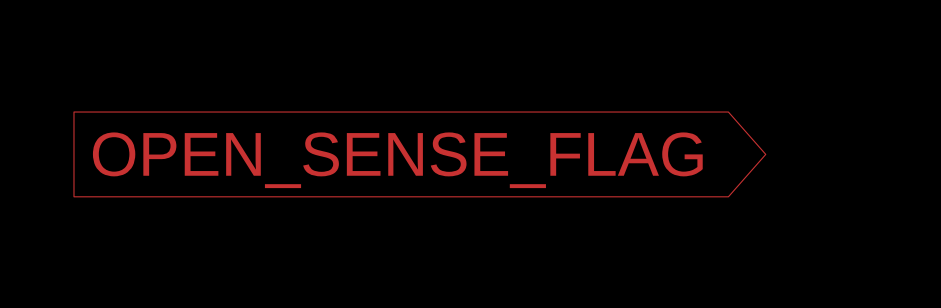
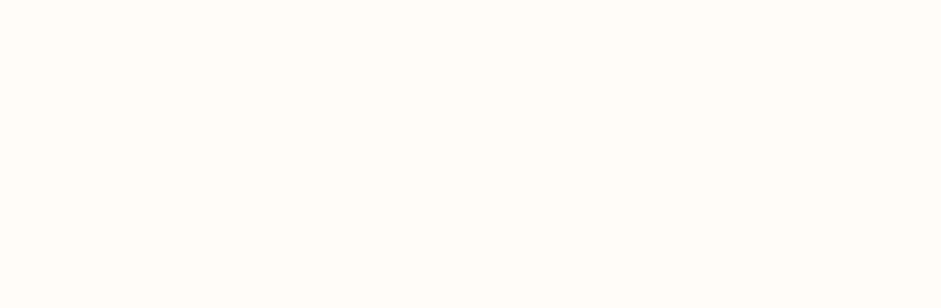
global label: OPEN_SENSE_FLAG (397, 160) -> none

